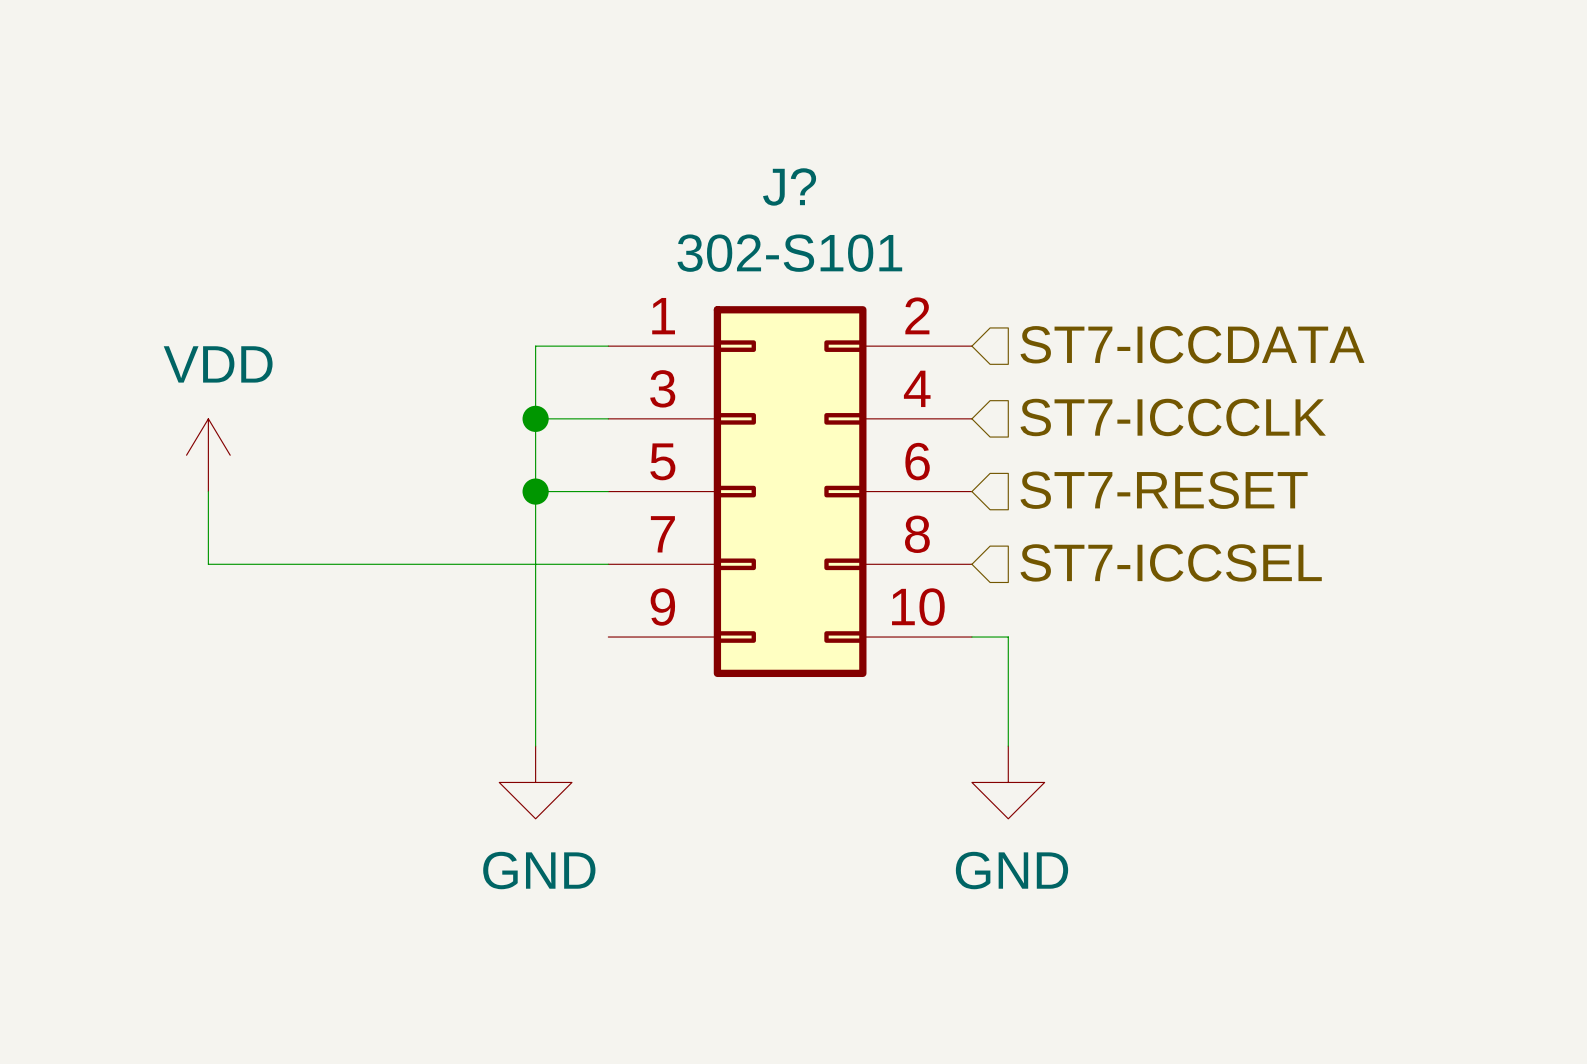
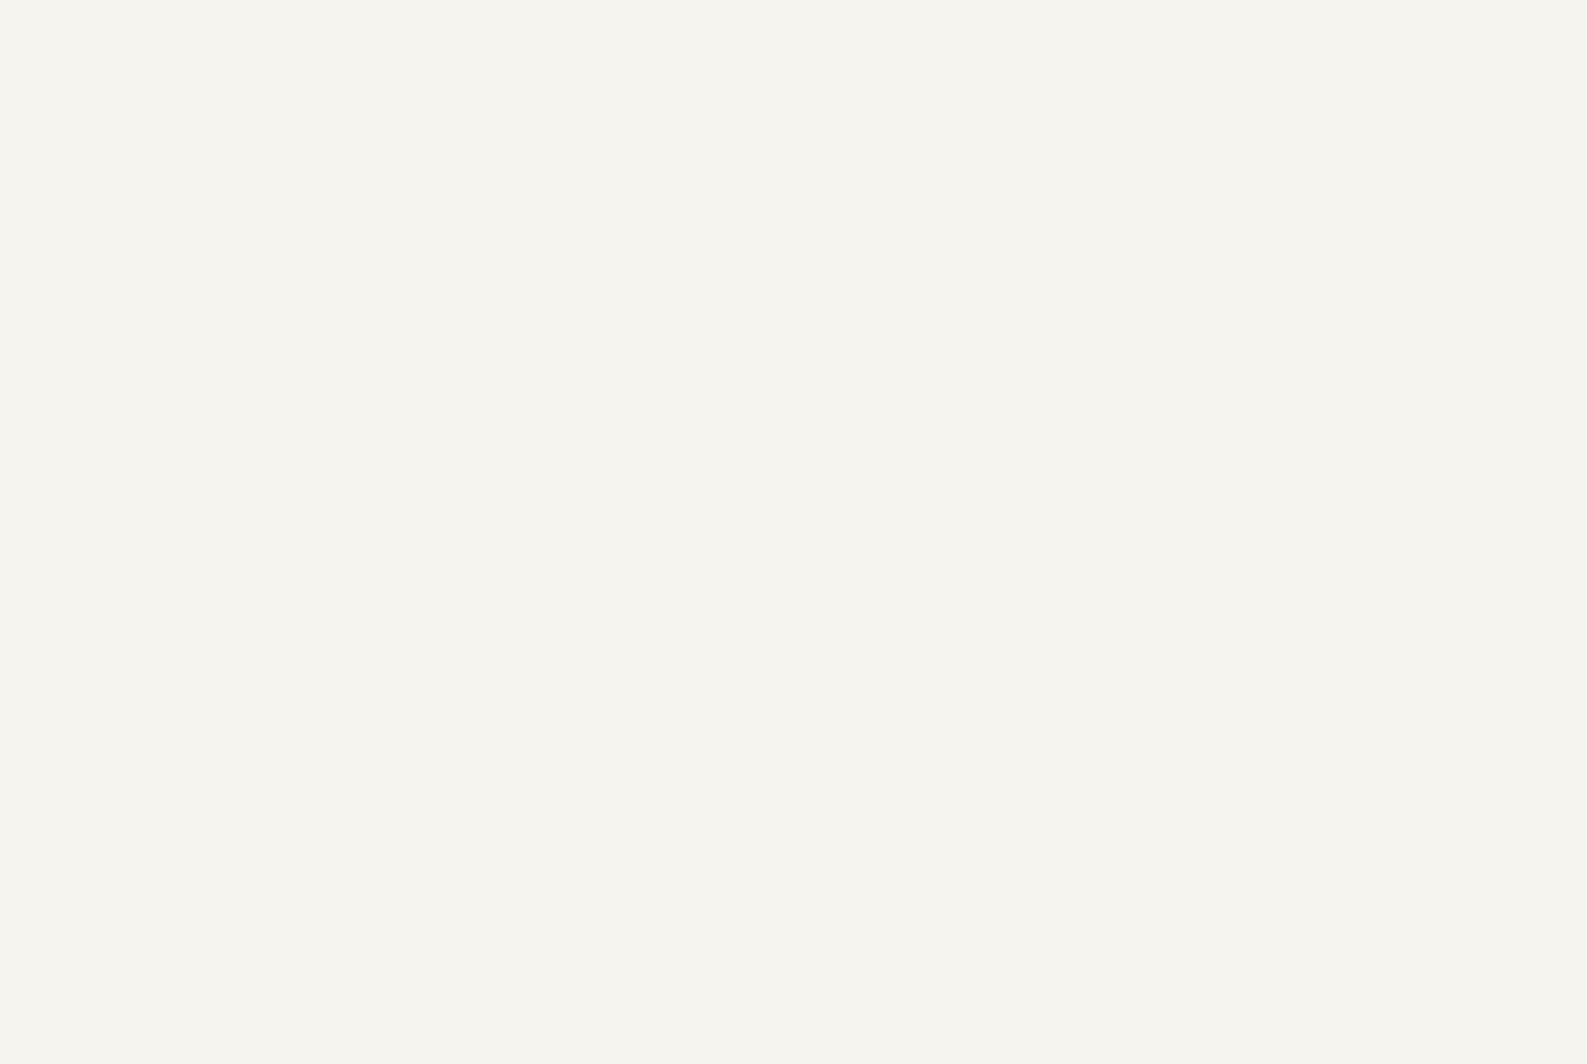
hierarchical label: ST7-ICCDATA (1192, 344) -> none
wire: (608, 346) (535, 346) (535, 746) -> none
hierarchical label: ST7-ICCCLK (1173, 417) -> none
wire: (535, 418) (608, 418) -> none
junction: (535, 418) -> none
power symbol: VDD (208, 455) -> none
hierarchical label: ST7-RESET (1164, 490) -> none
wire: (208, 491) (208, 564) (608, 564) -> none
wire: (535, 491) (608, 491) -> none
junction: (535, 491) -> none
J?: 302-S101 (790, 491) -> none
hierarchical label: ST7-ICCSEL (1171, 562) -> none
wire: (971, 637) (1008, 637) (1008, 746) -> none
power symbol: GND (535, 782) -> none
power symbol: GND (1008, 782) -> none

